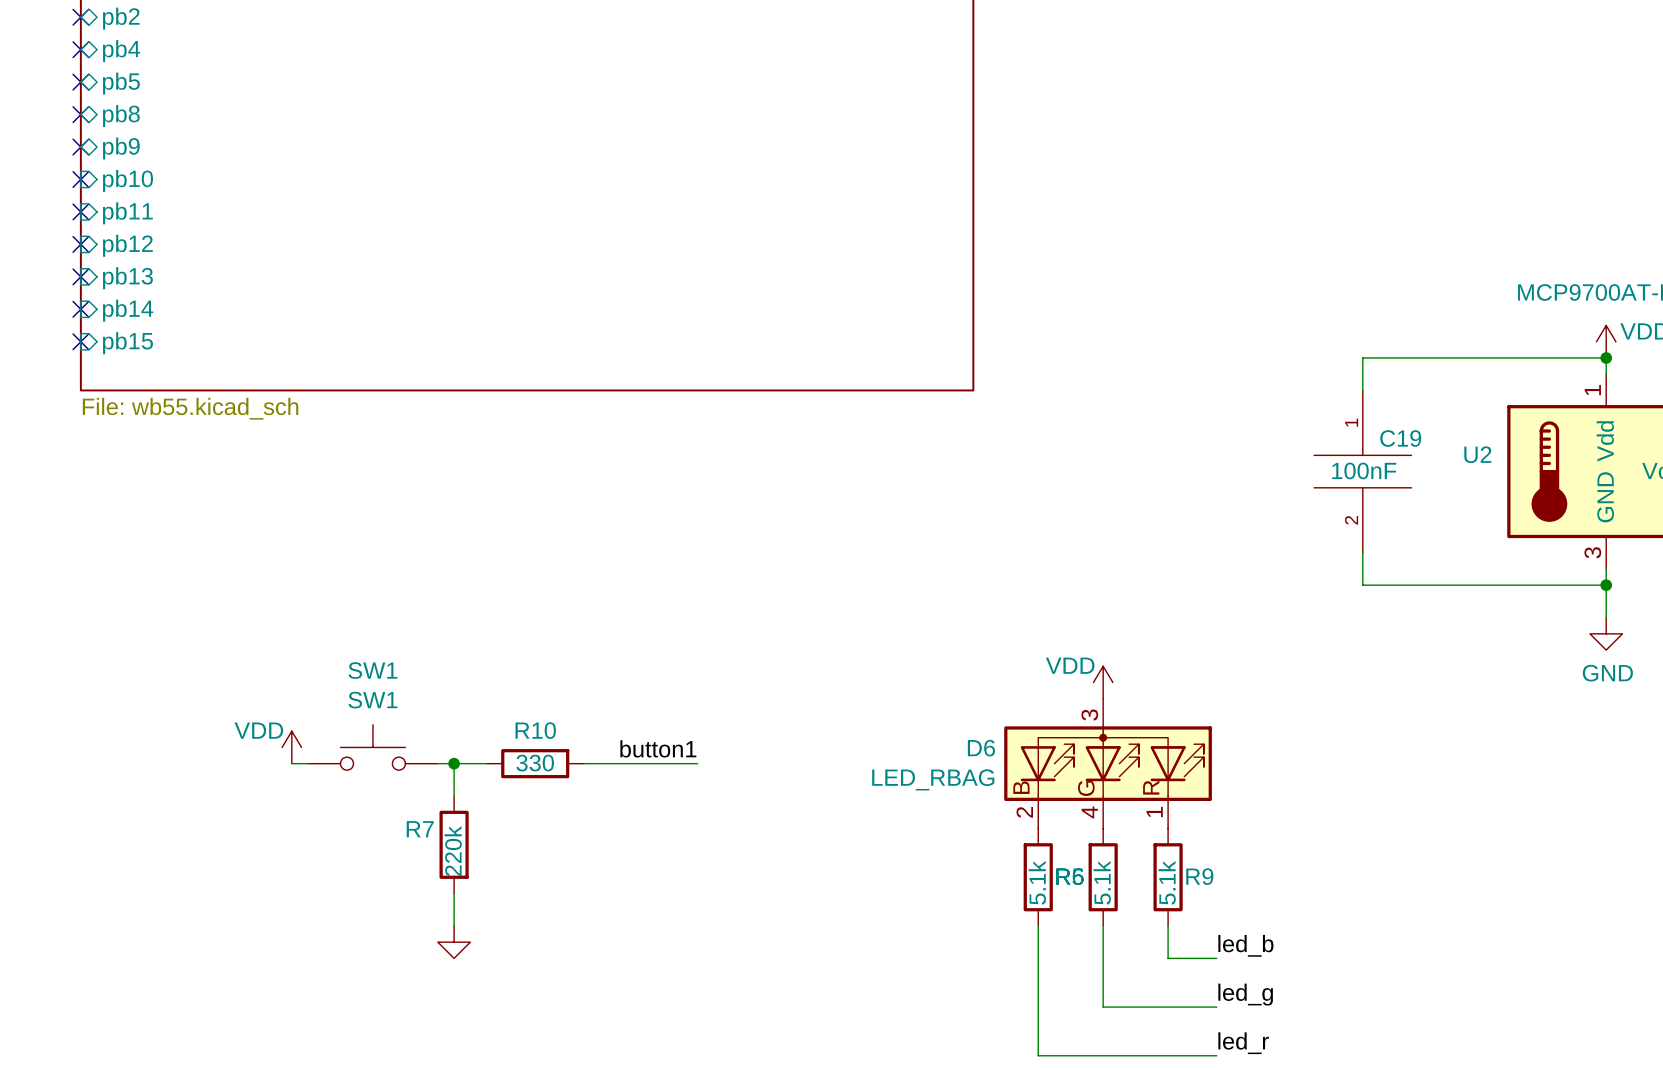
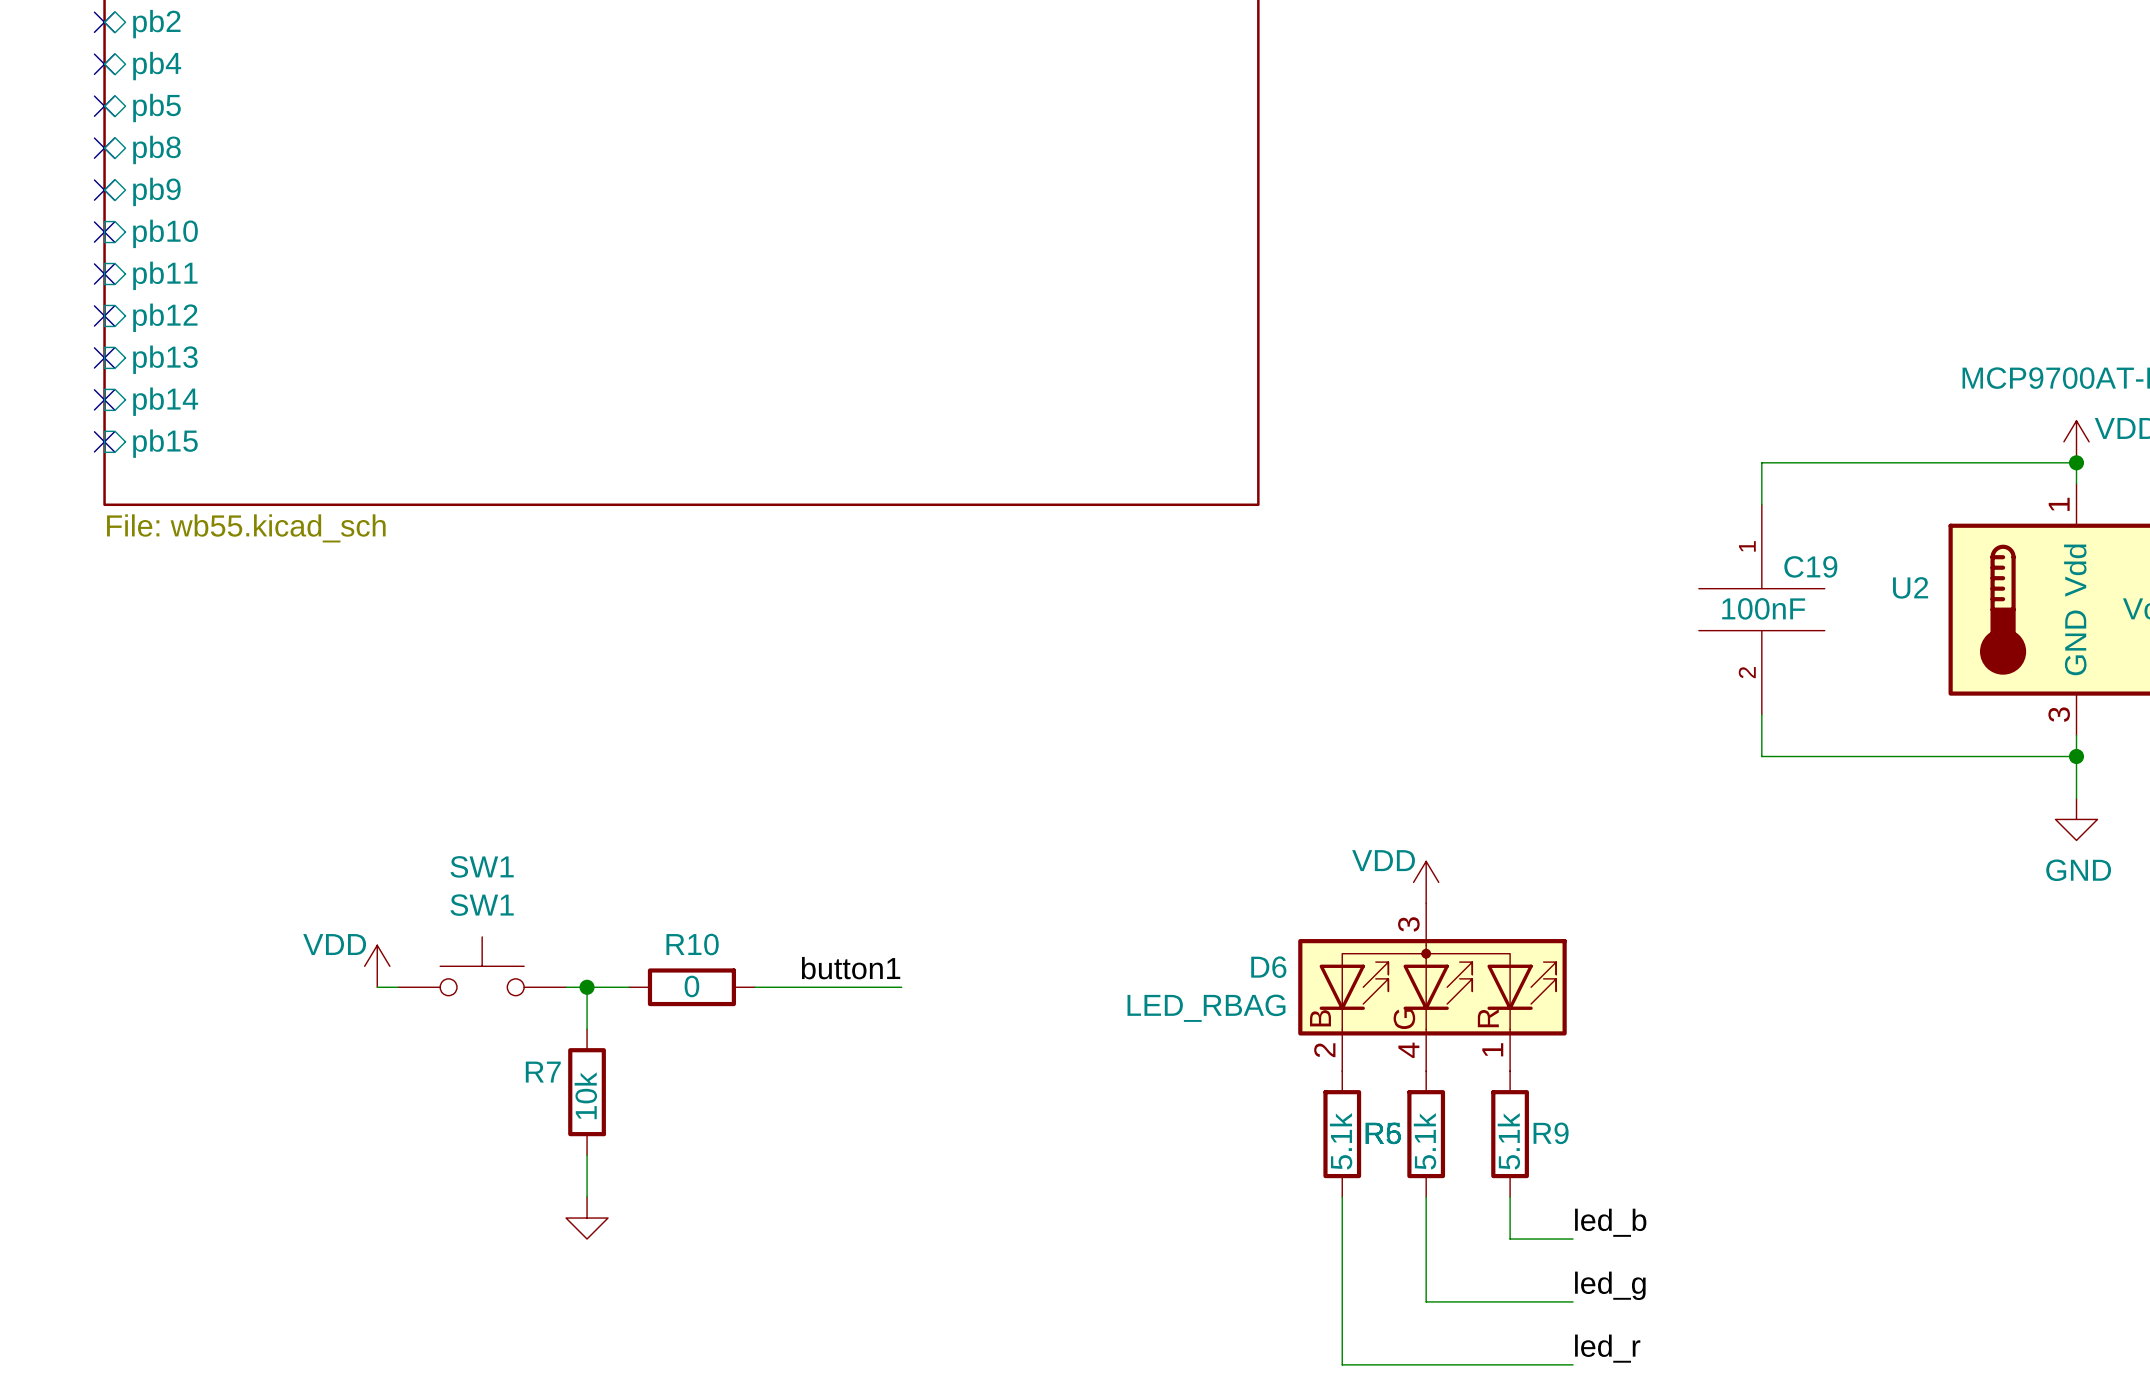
R10 value: 330 (535, 763) -> 0 (691, 986)
R7 value: 220k (453, 851) -> 10k (585, 1095)

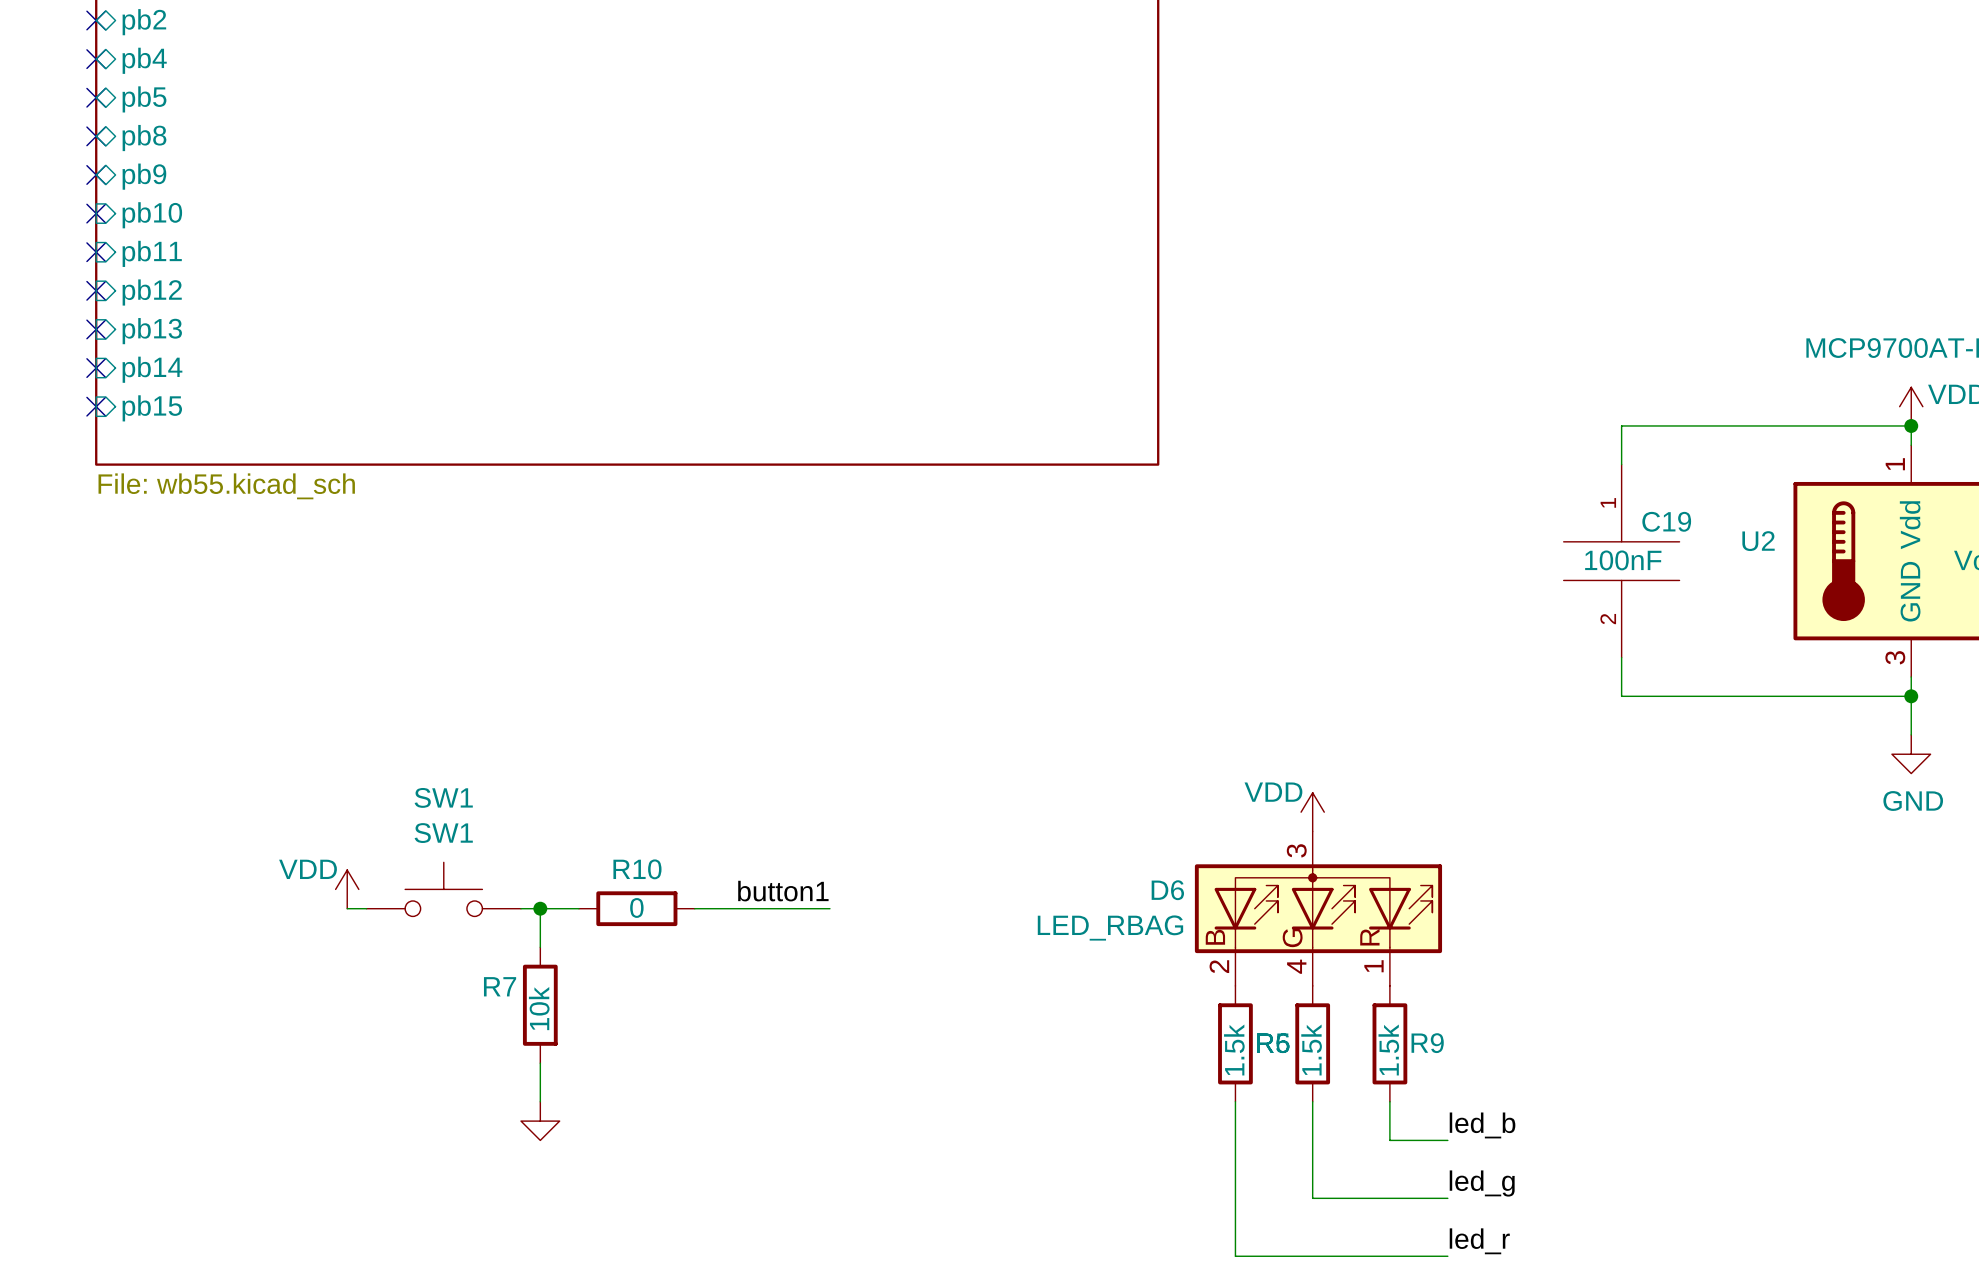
part value: 5.1k (1341, 1141) -> 1.5k (1234, 1049)
part value: 5.1k (1424, 1141) -> 1.5k (1311, 1049)
R9 value: 5.1k (1508, 1141) -> 1.5k (1388, 1049)

